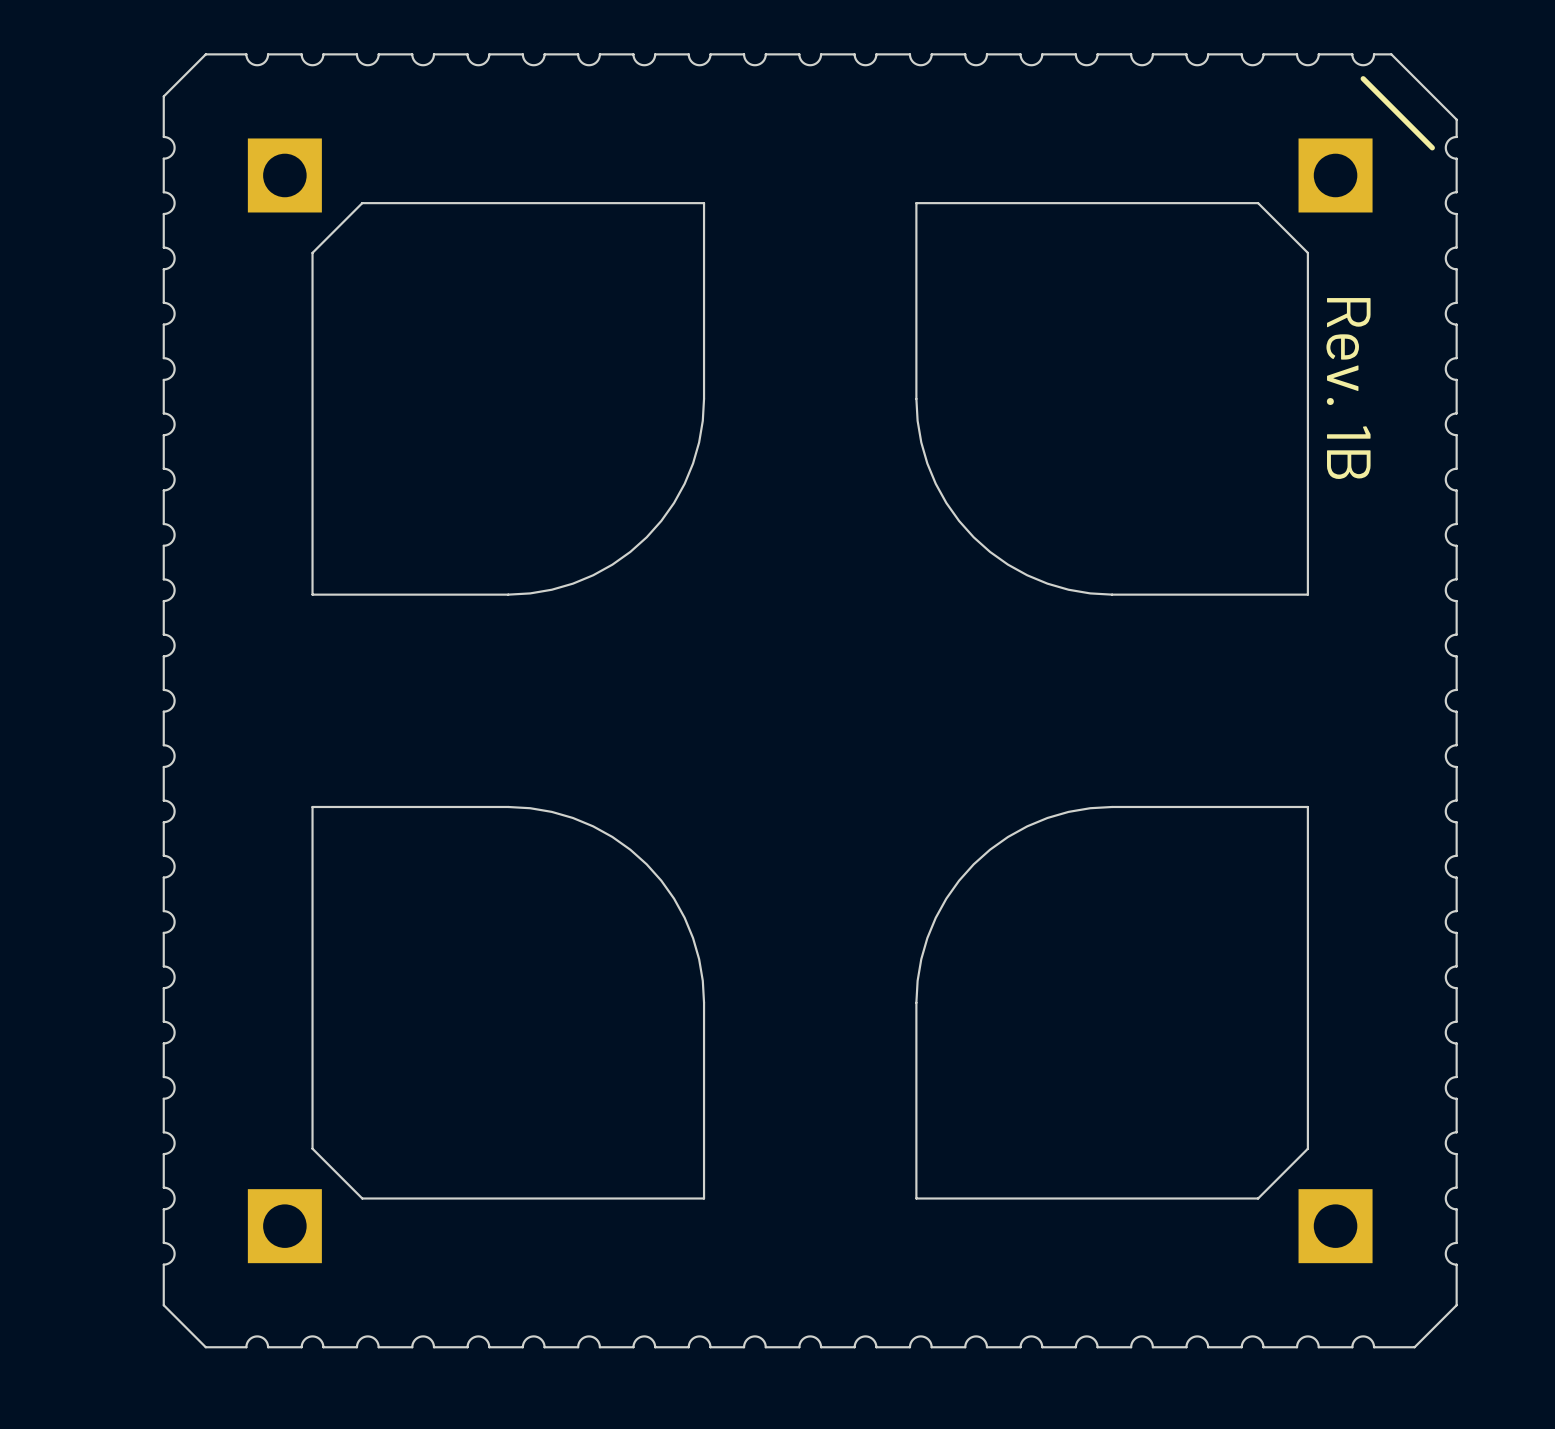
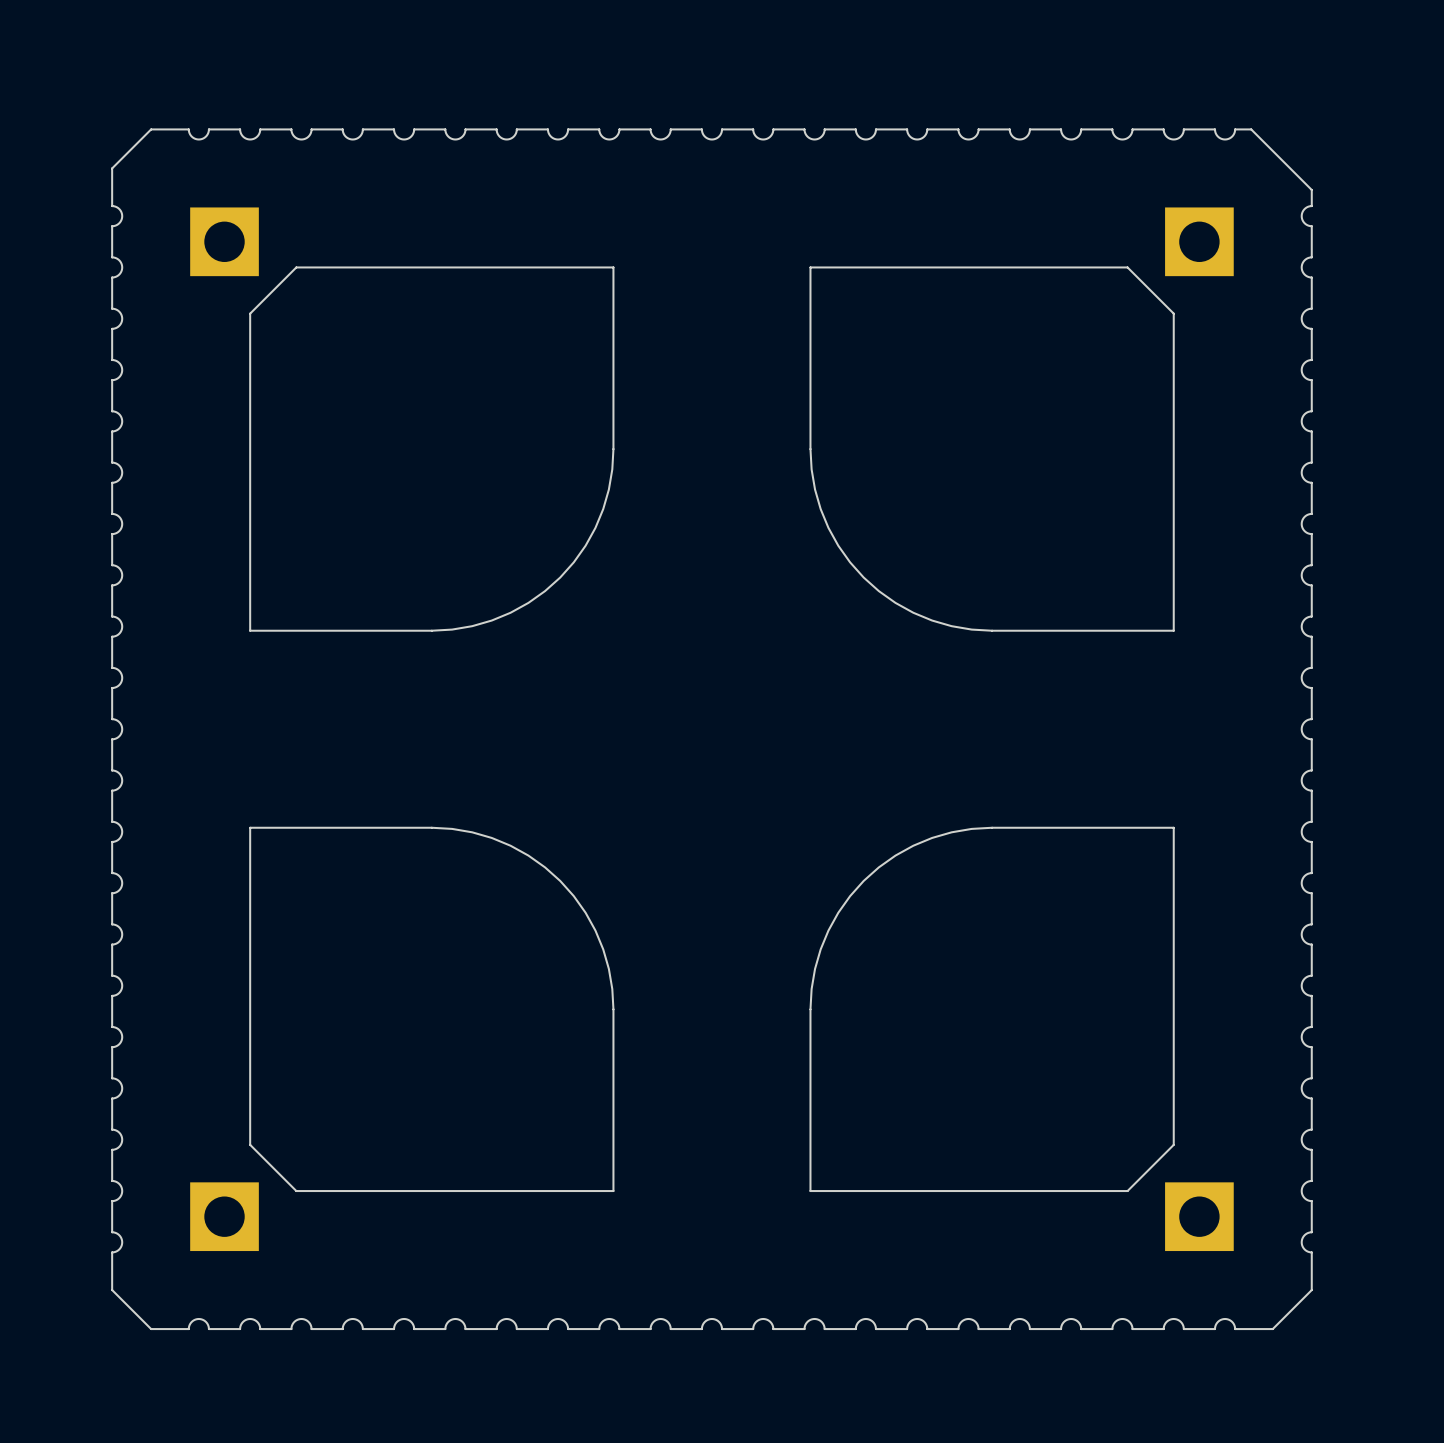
line: (1363, 78) (1432, 147) -> none
text: Rev. 1B (1348, 388) -> none

